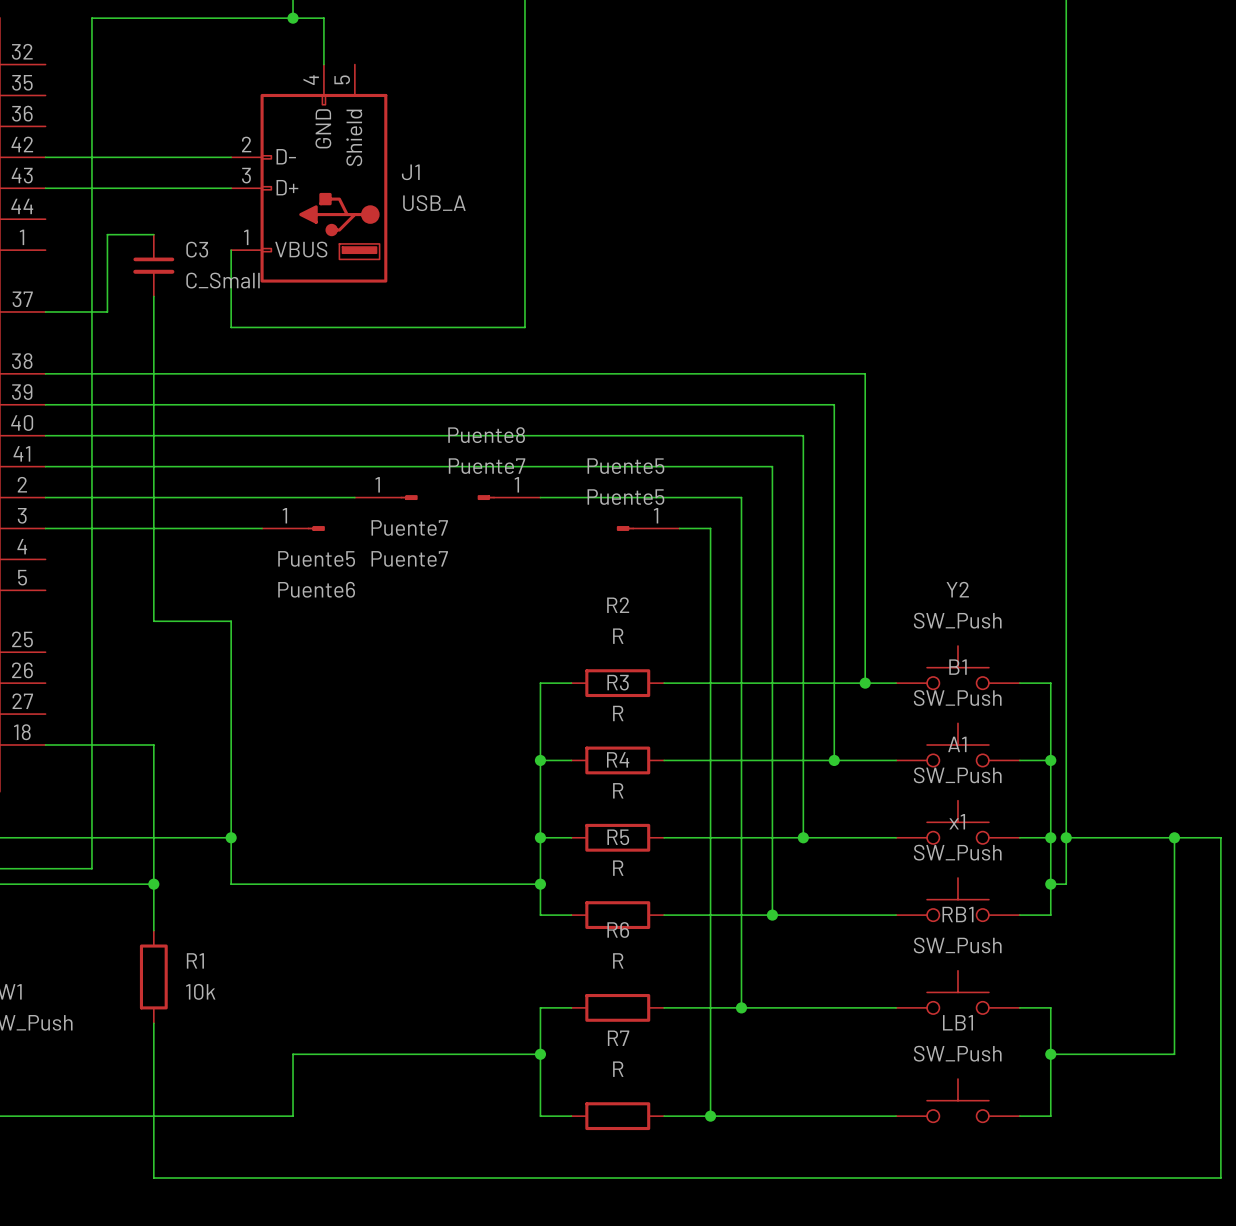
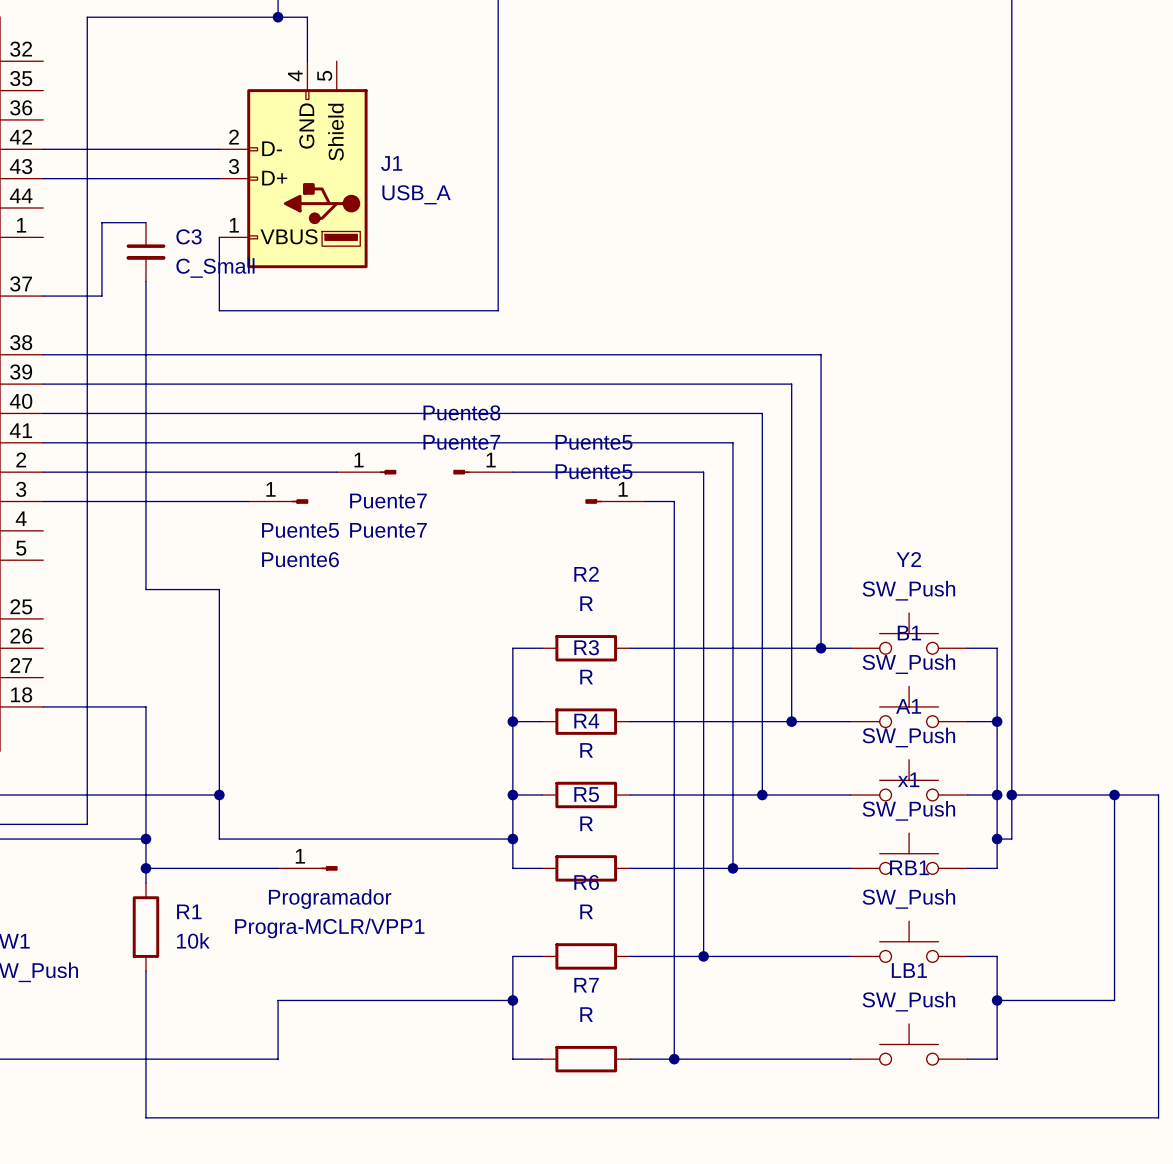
wire: none -> (145, 868) (278, 868)
junction: none -> (145, 868)
Progra-MCLR/VPP1: none -> Programador (307, 868)

